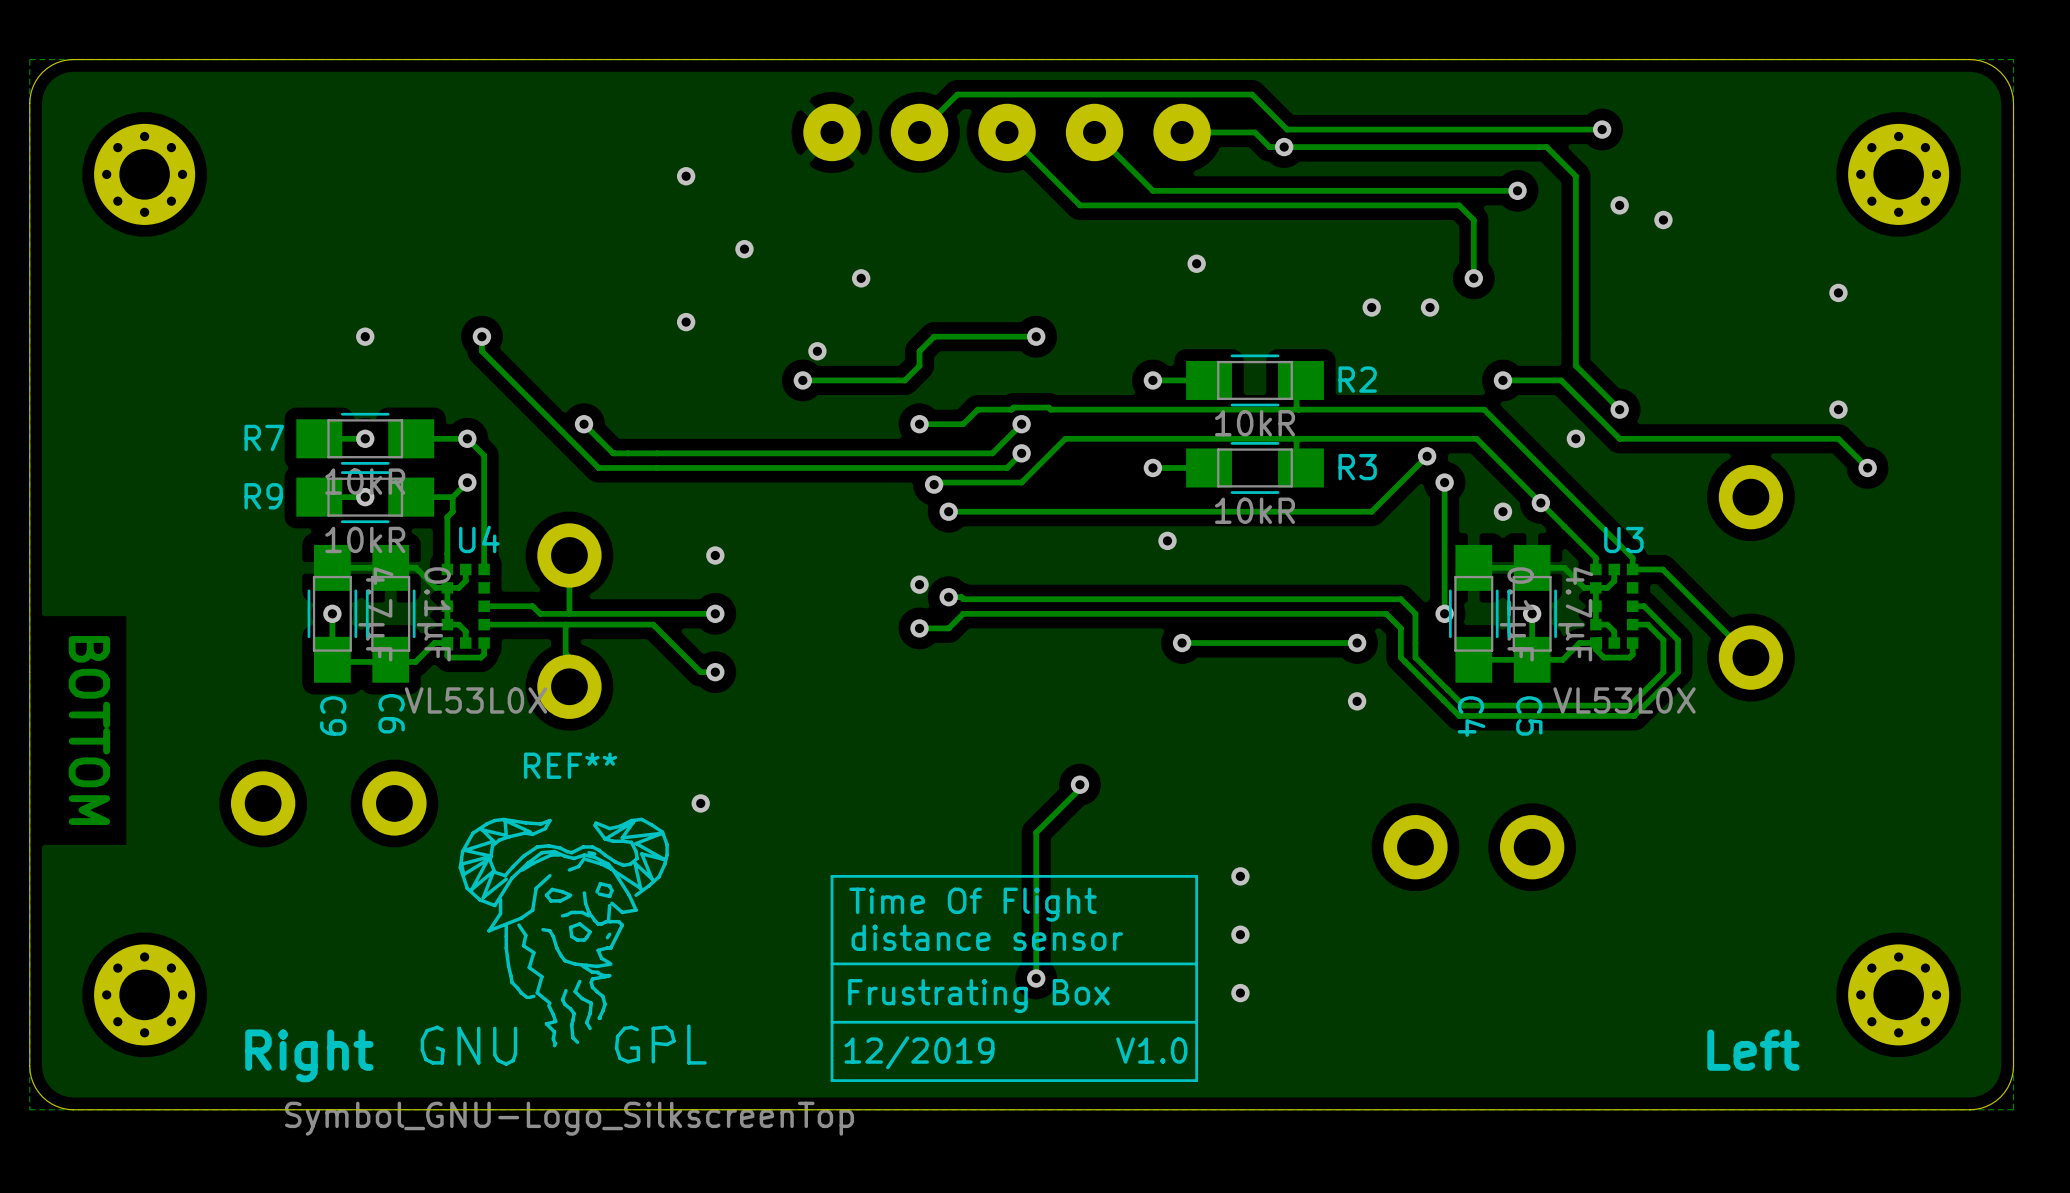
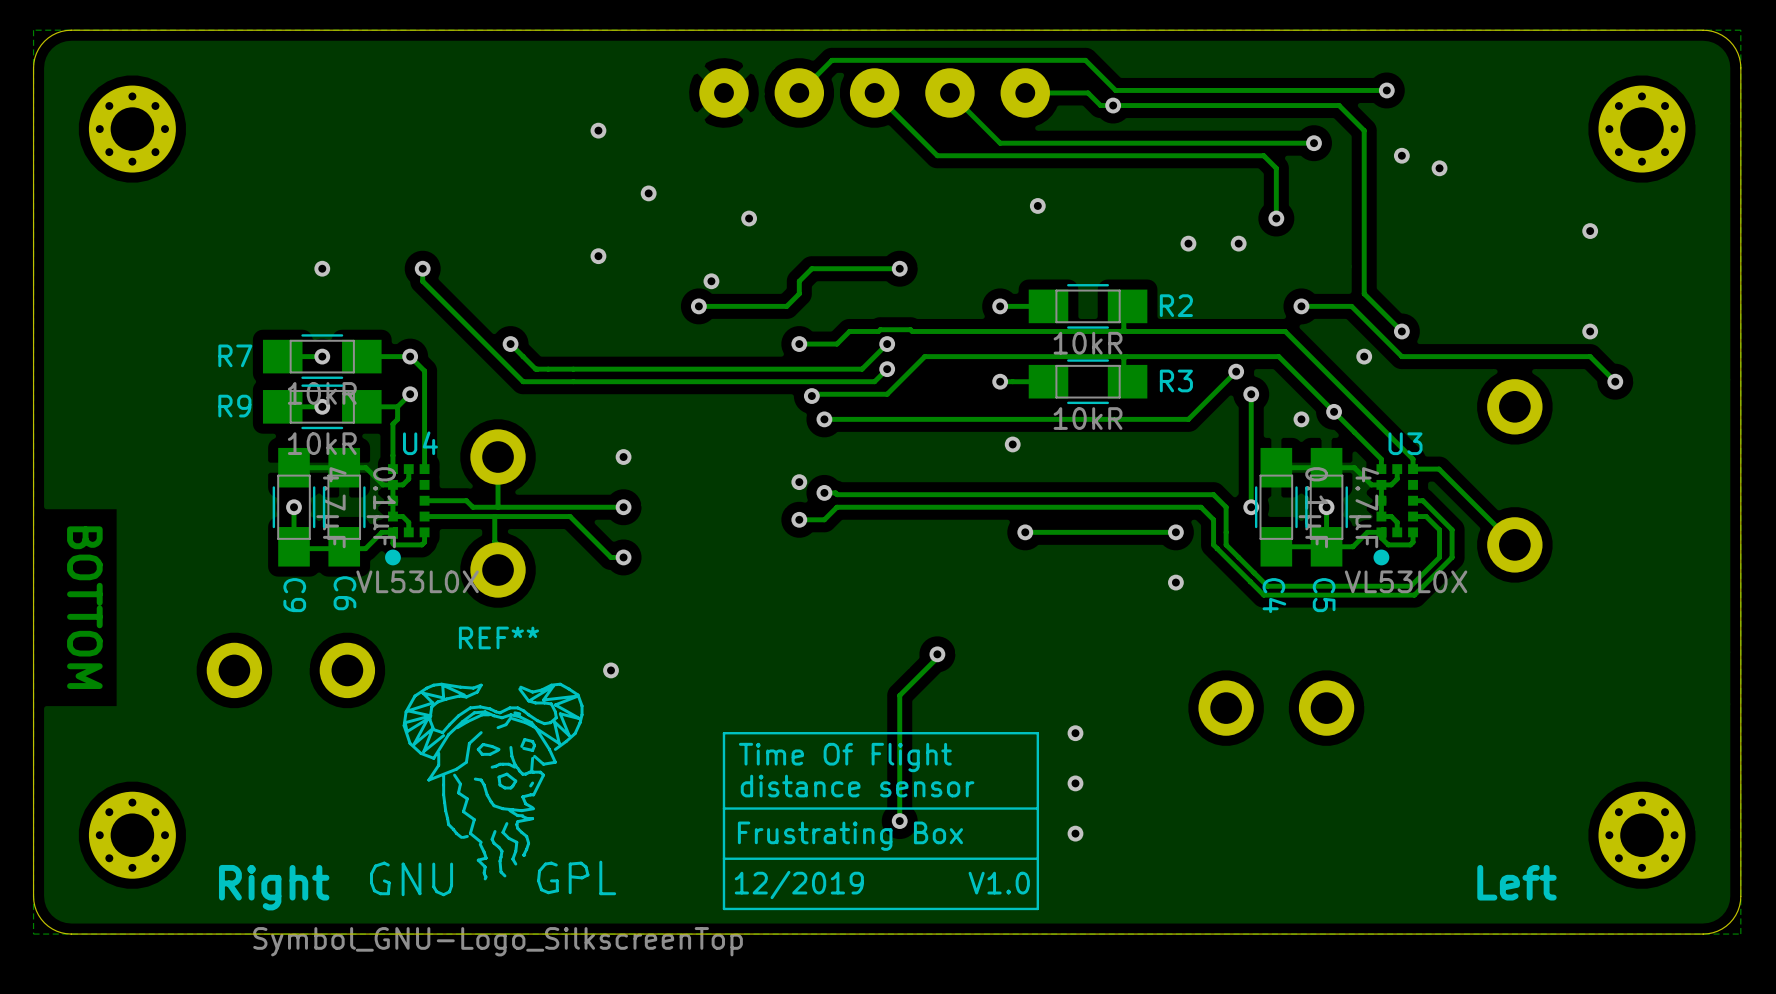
U4 footprint: [441, 563, 490, 651] -> [385, 464, 430, 566]
U3 footprint: [1590, 563, 1639, 651] -> [1373, 464, 1418, 566]

